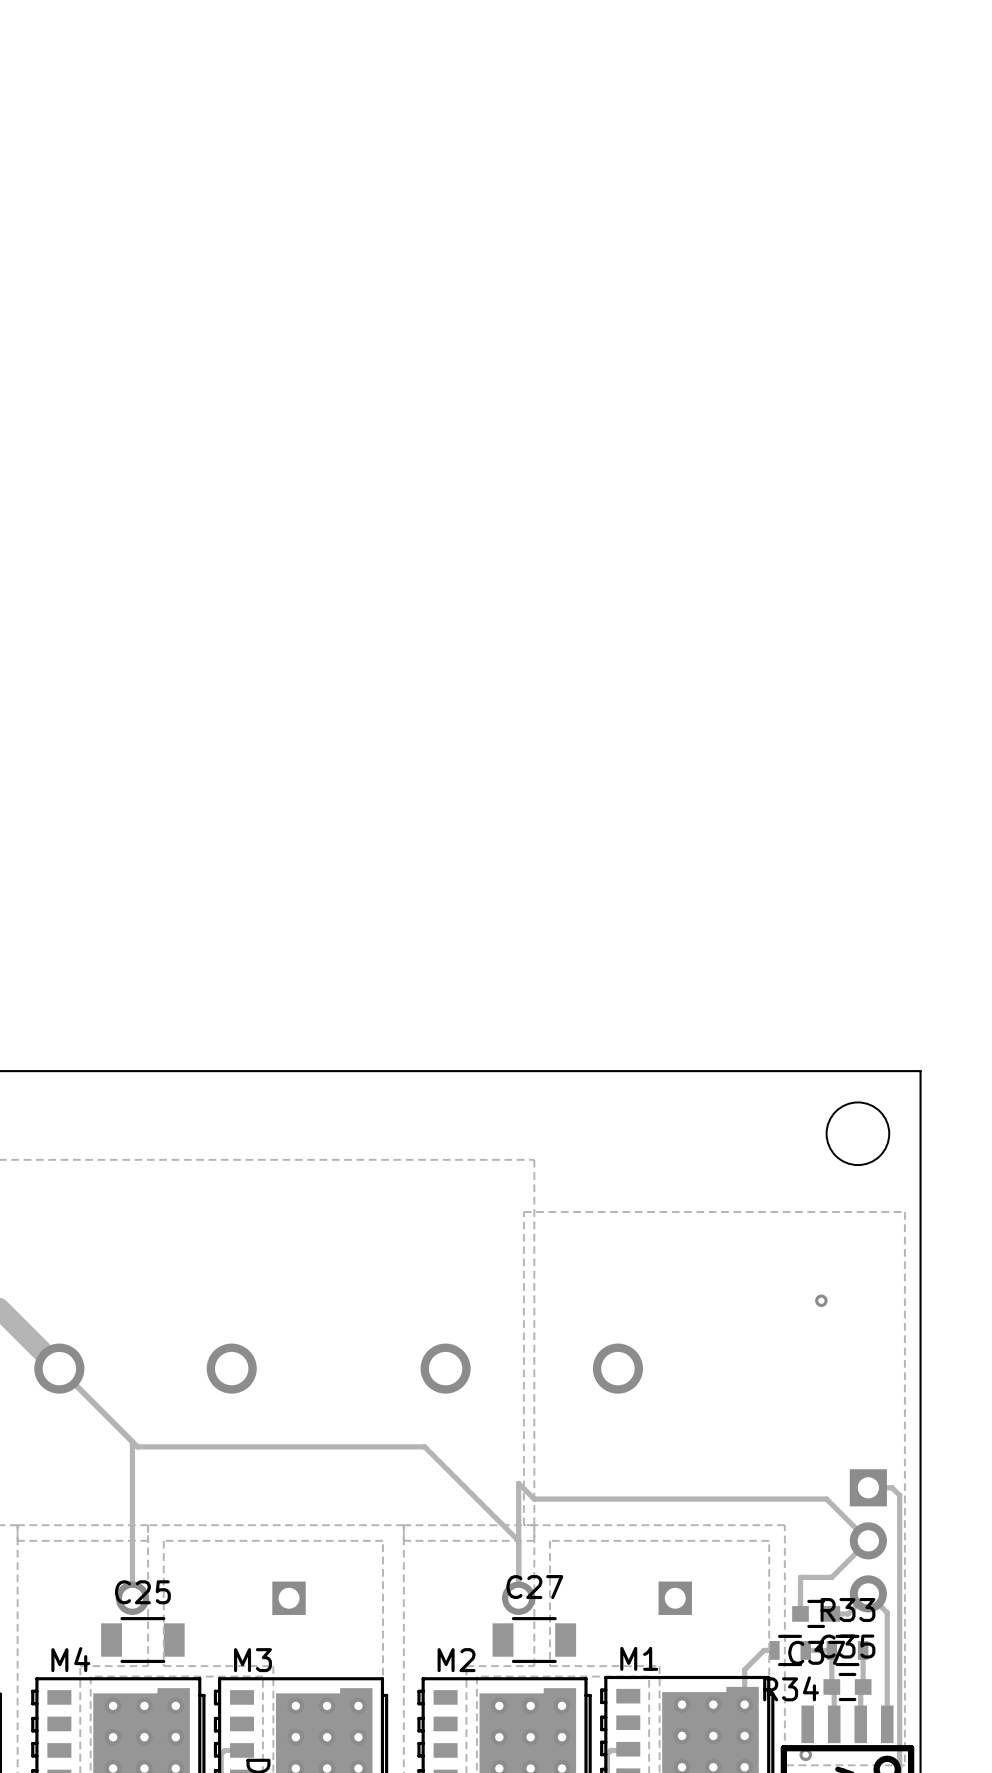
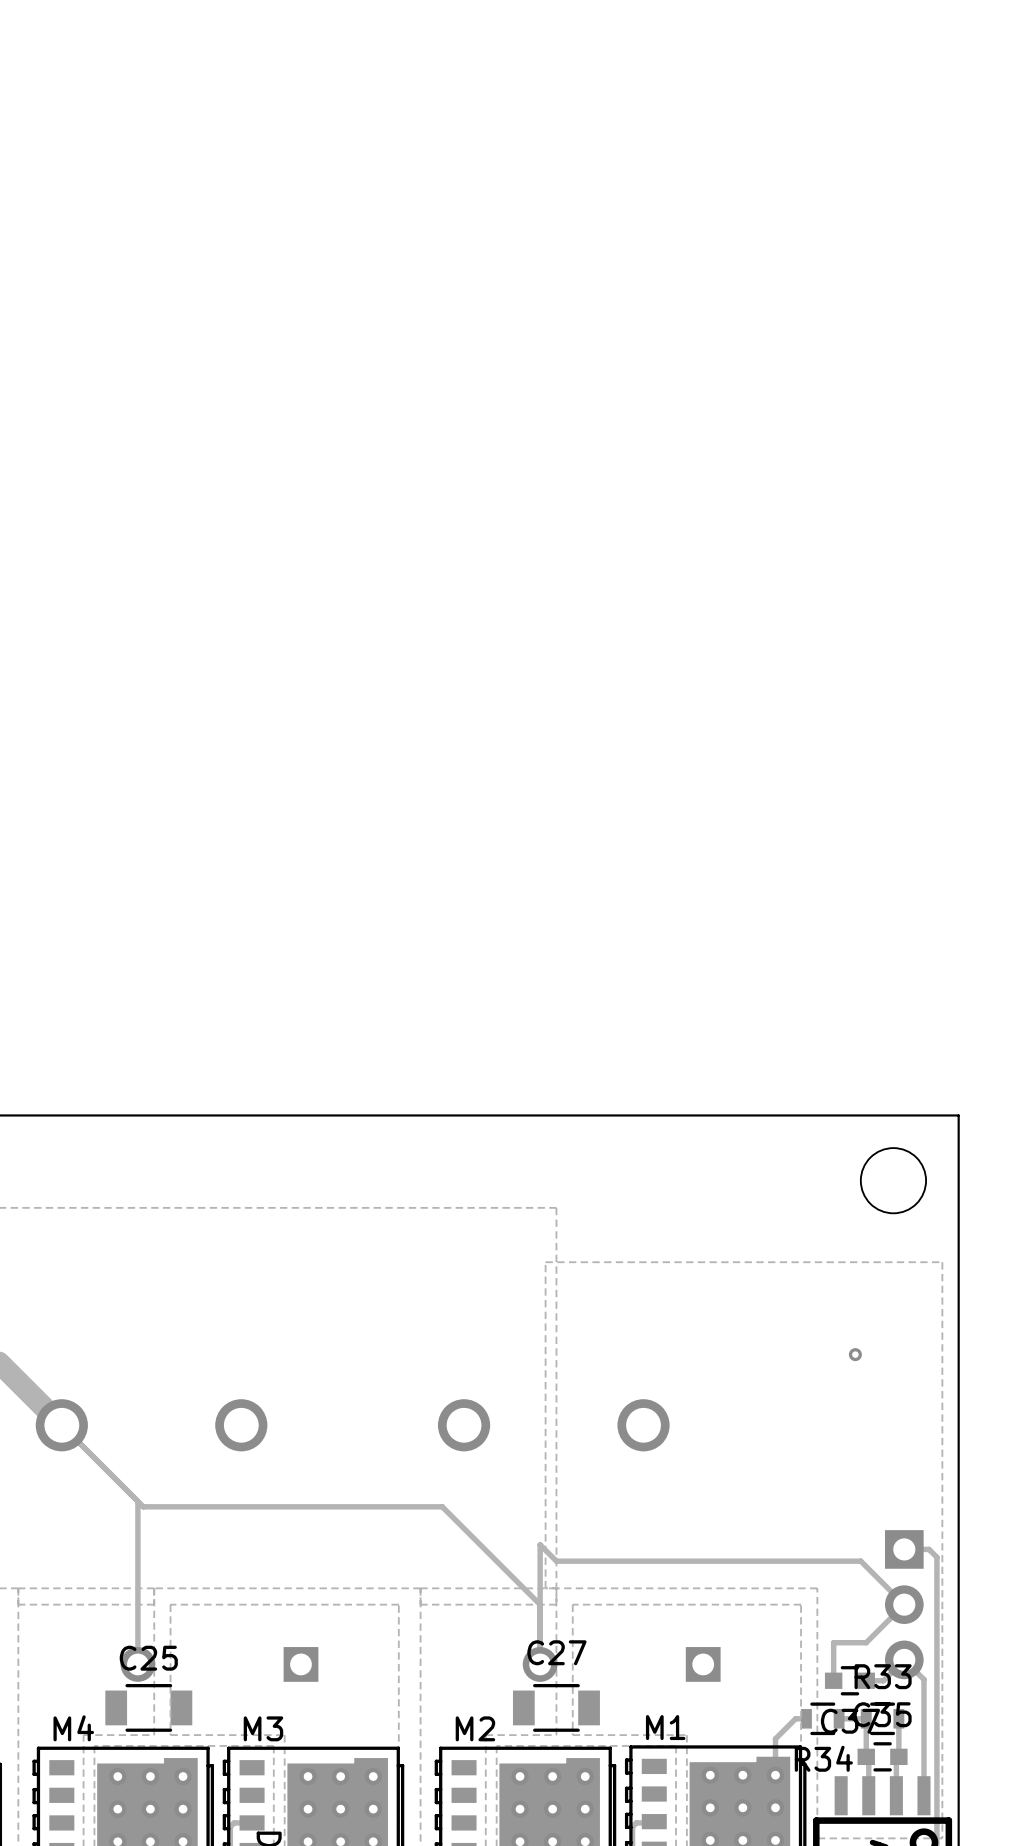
via: (805, 1754) -> none

